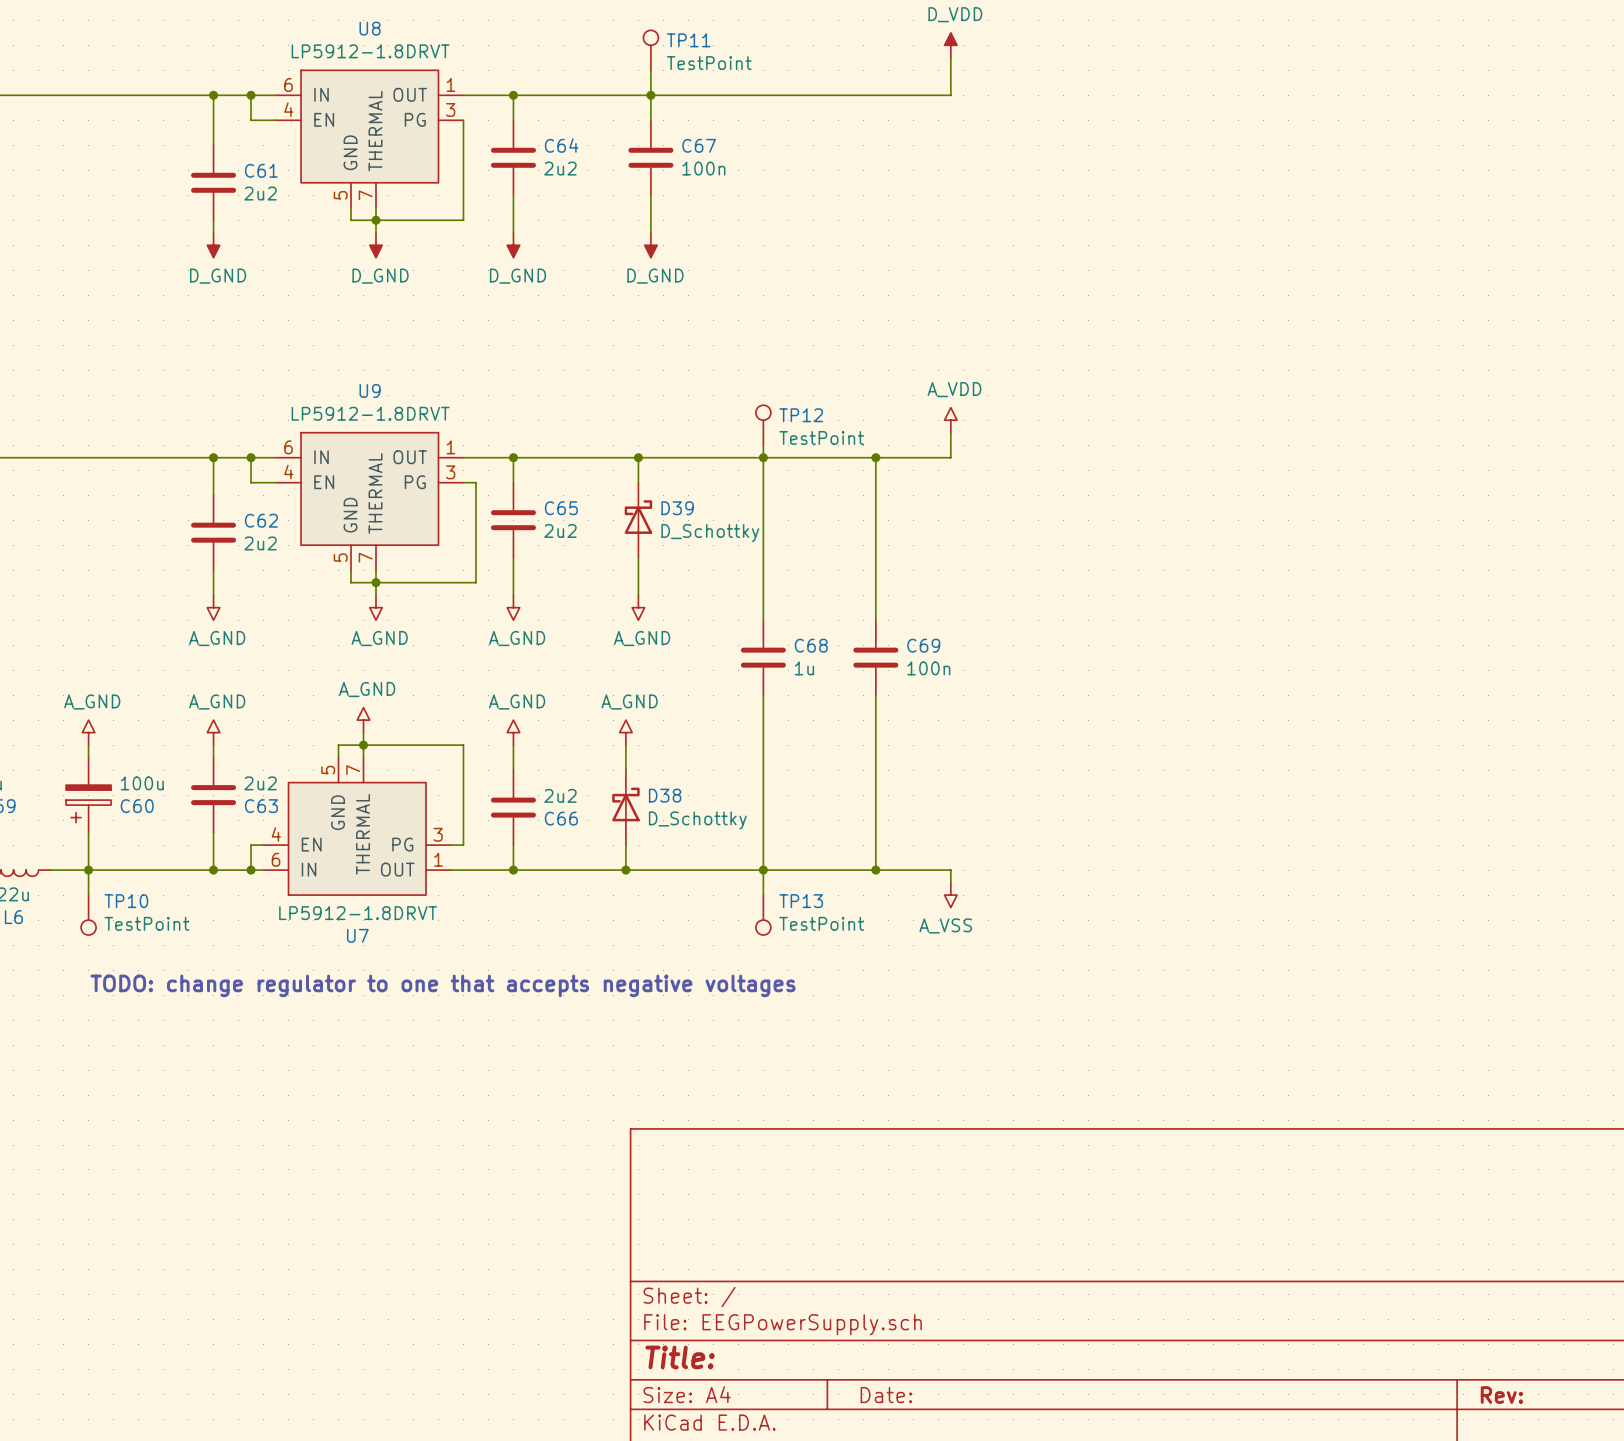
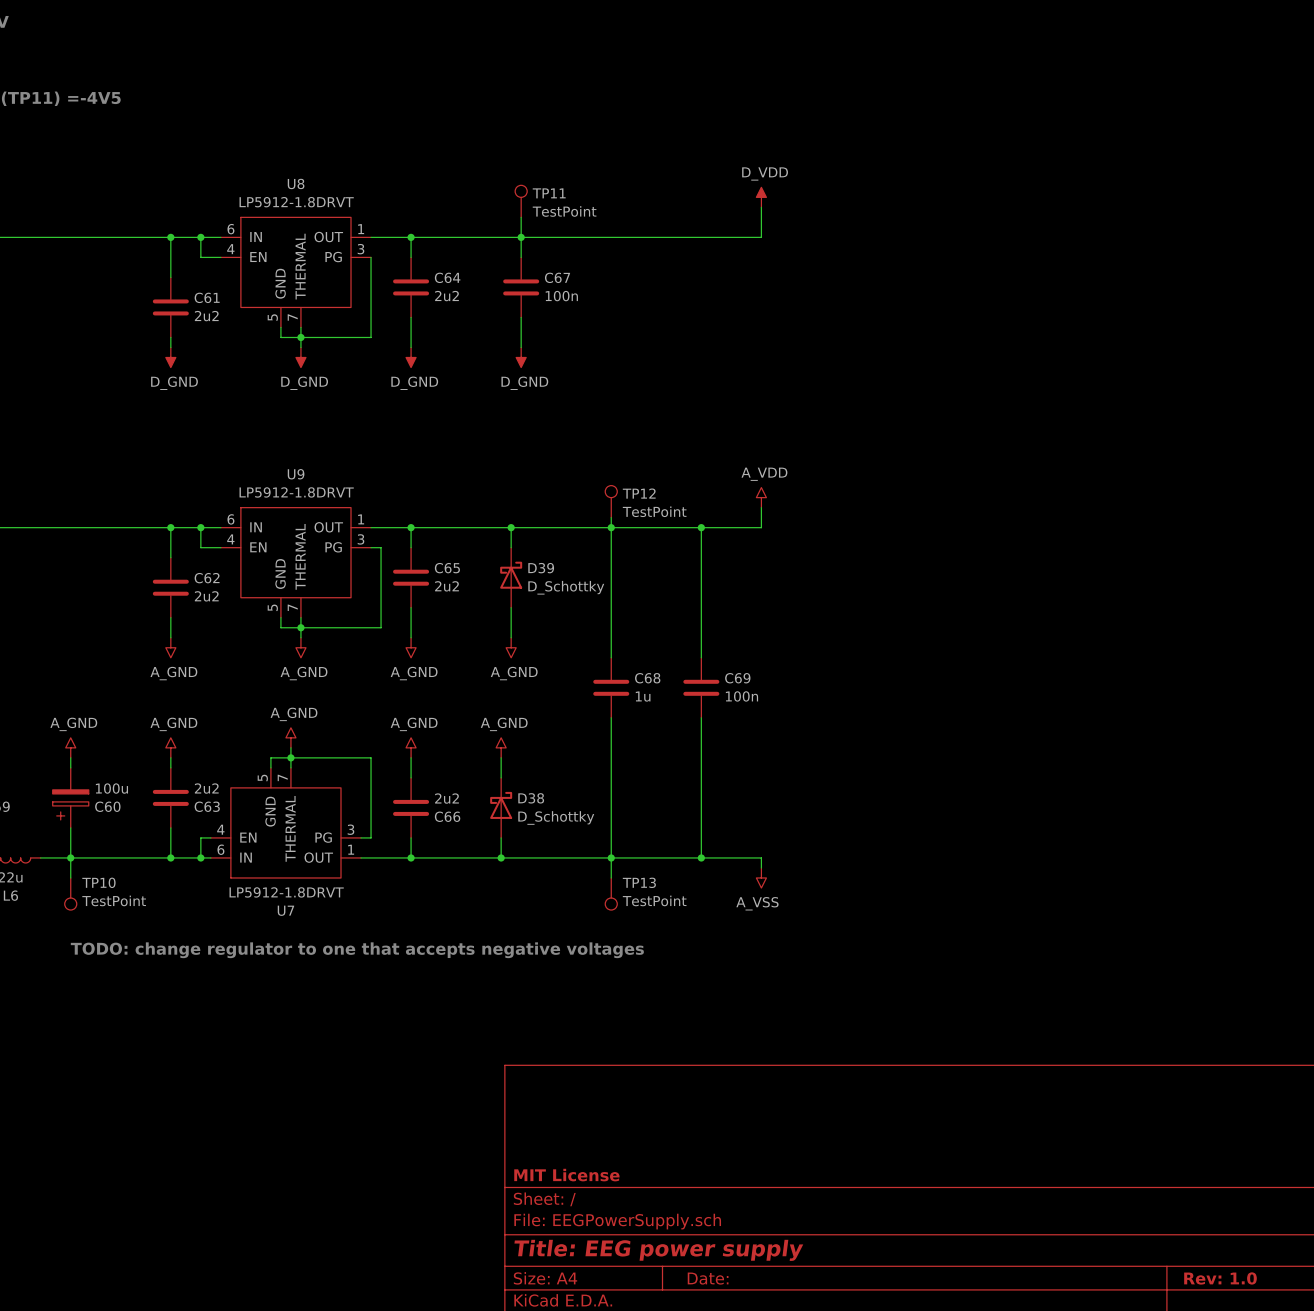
title block: none -> MIT License (566, 1175)
title block: Title: (680, 1357) -> Title: EEG power supply (658, 1250)
title block: Rev: (1501, 1395) -> Rev: 1.0 (1220, 1278)

